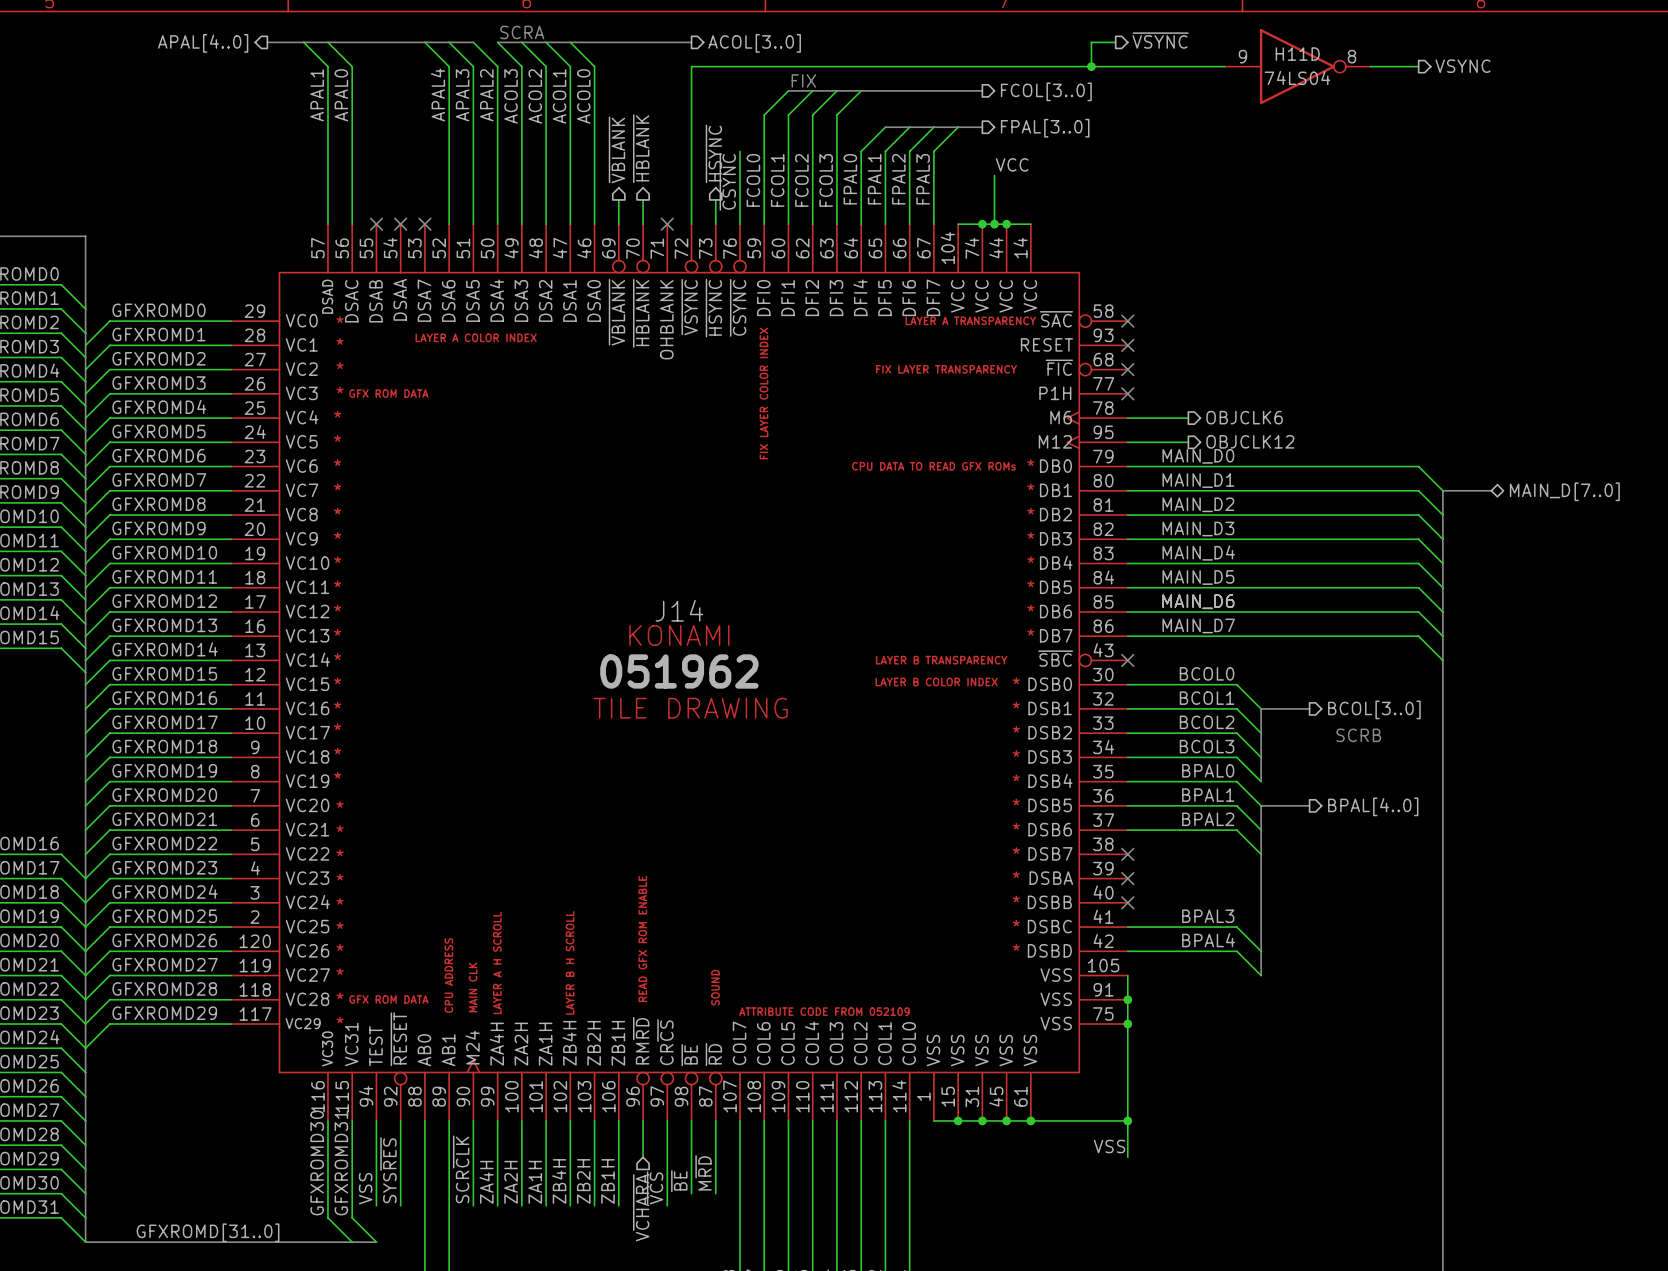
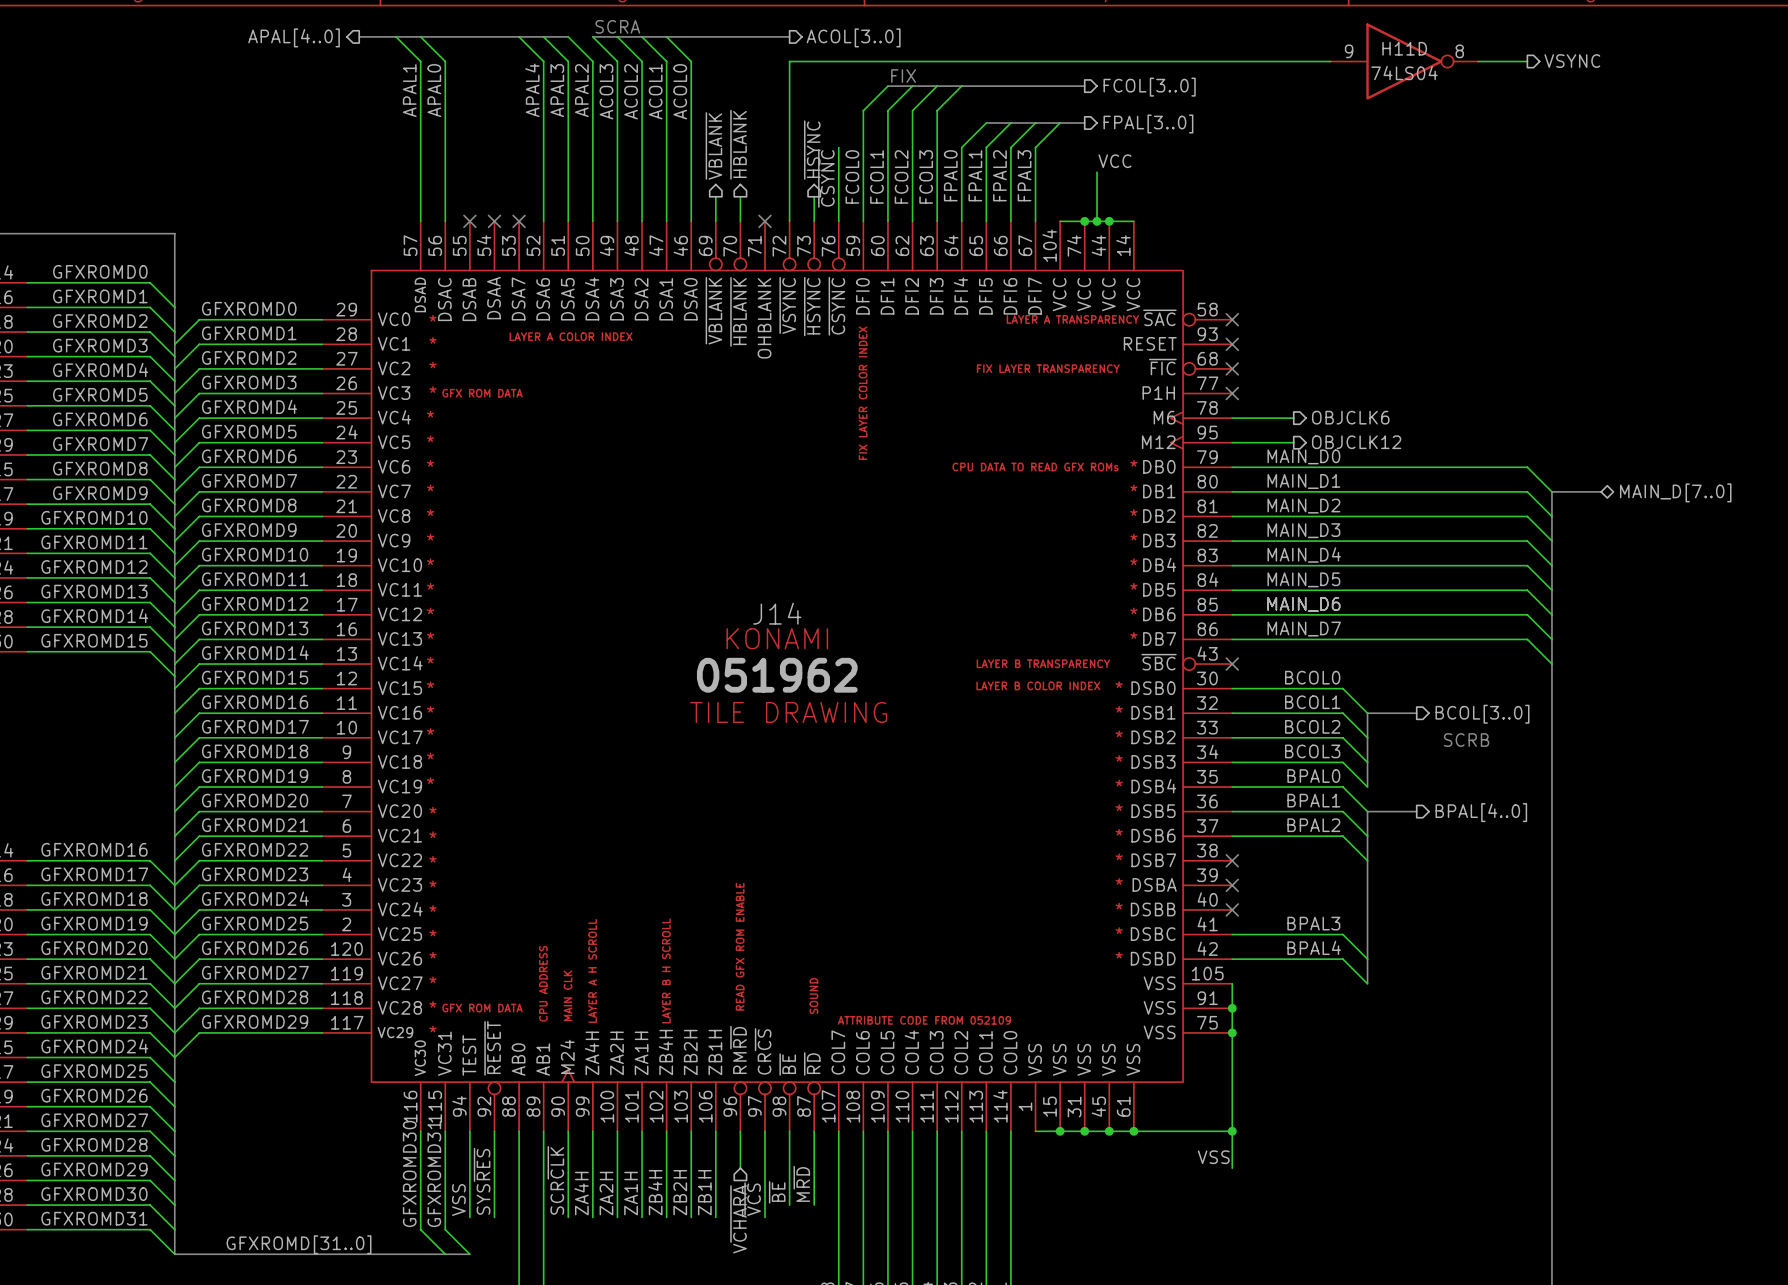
hierarchical label: ~{VSYNC} (1160, 40) -> none
wire: (1115, 42) (1091, 42) (1091, 66) -> none
junction: (1091, 66) -> none

